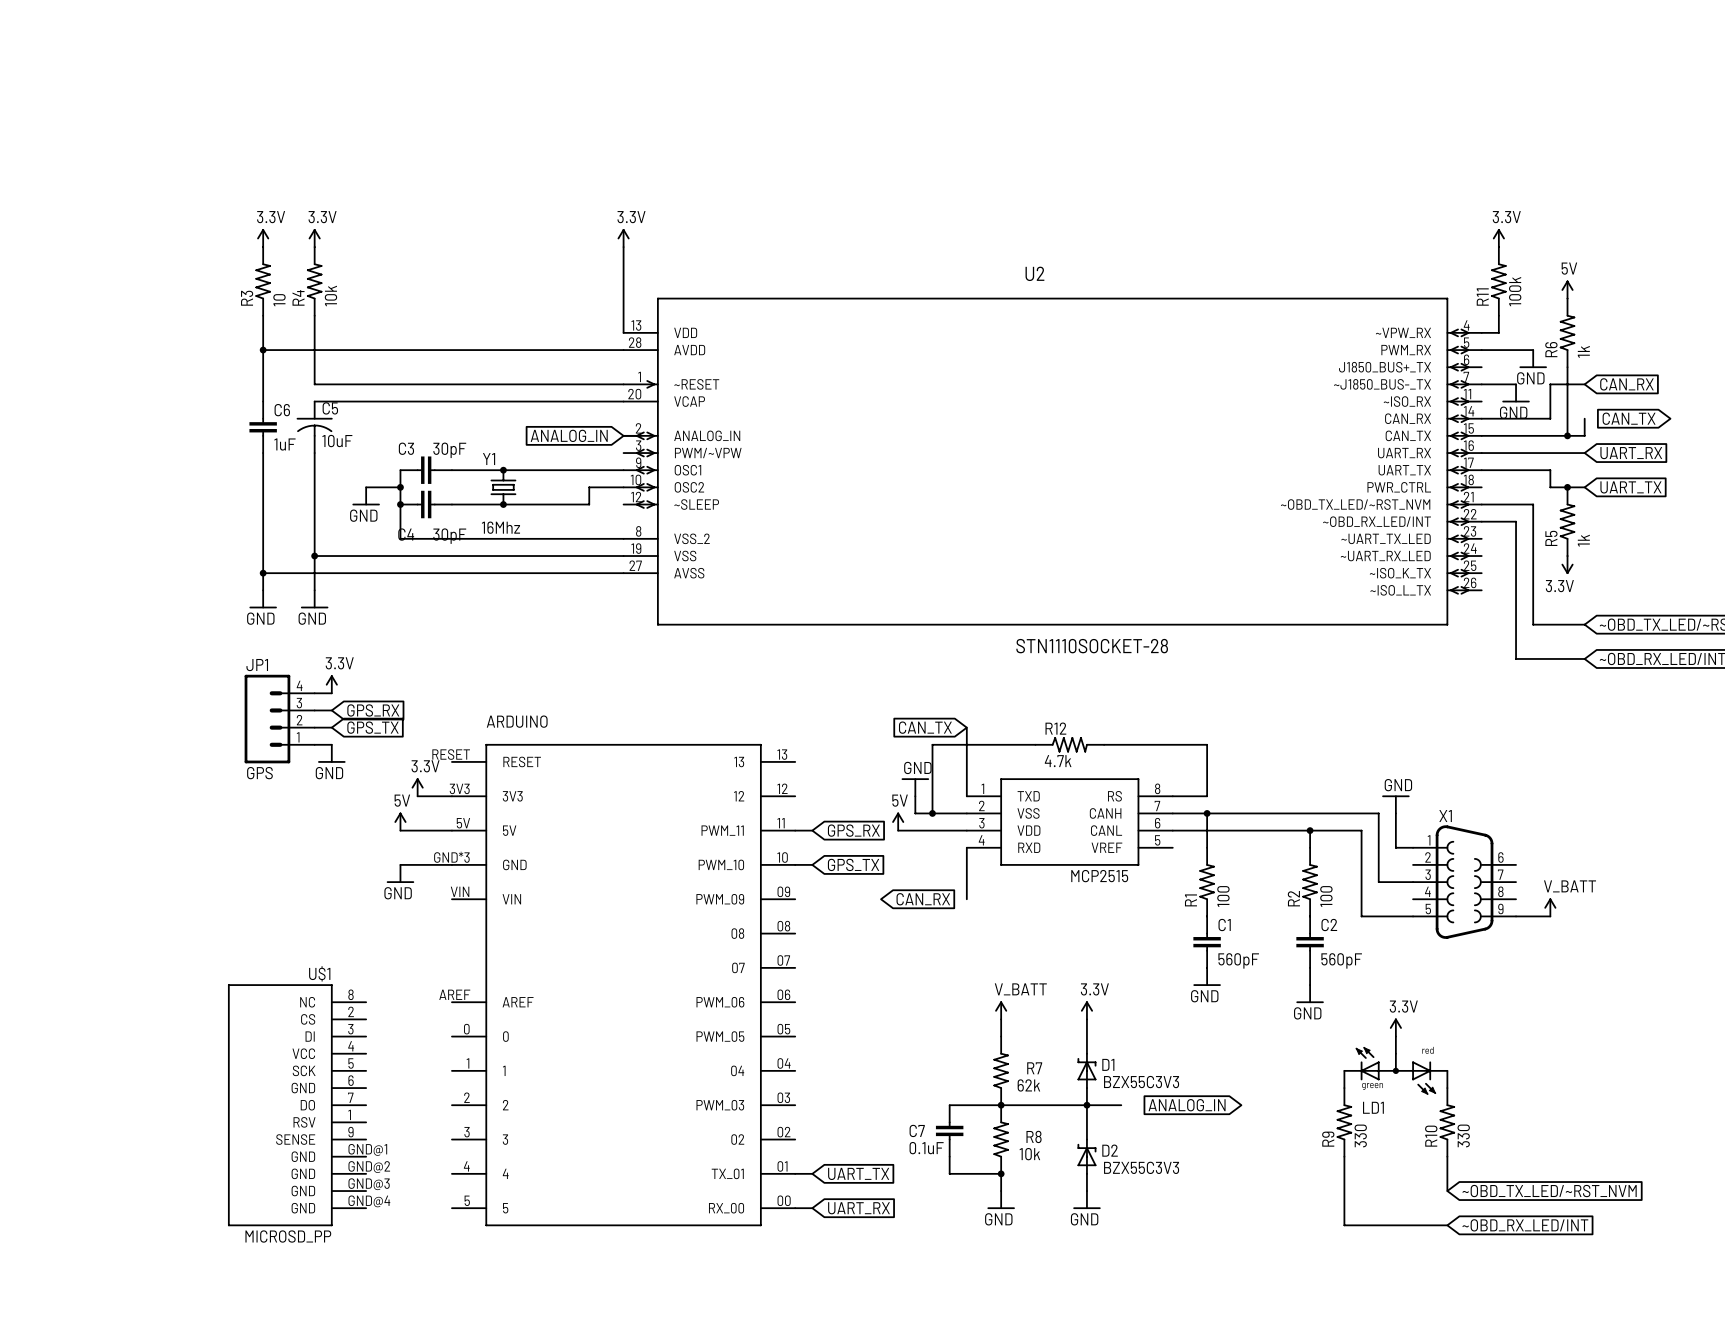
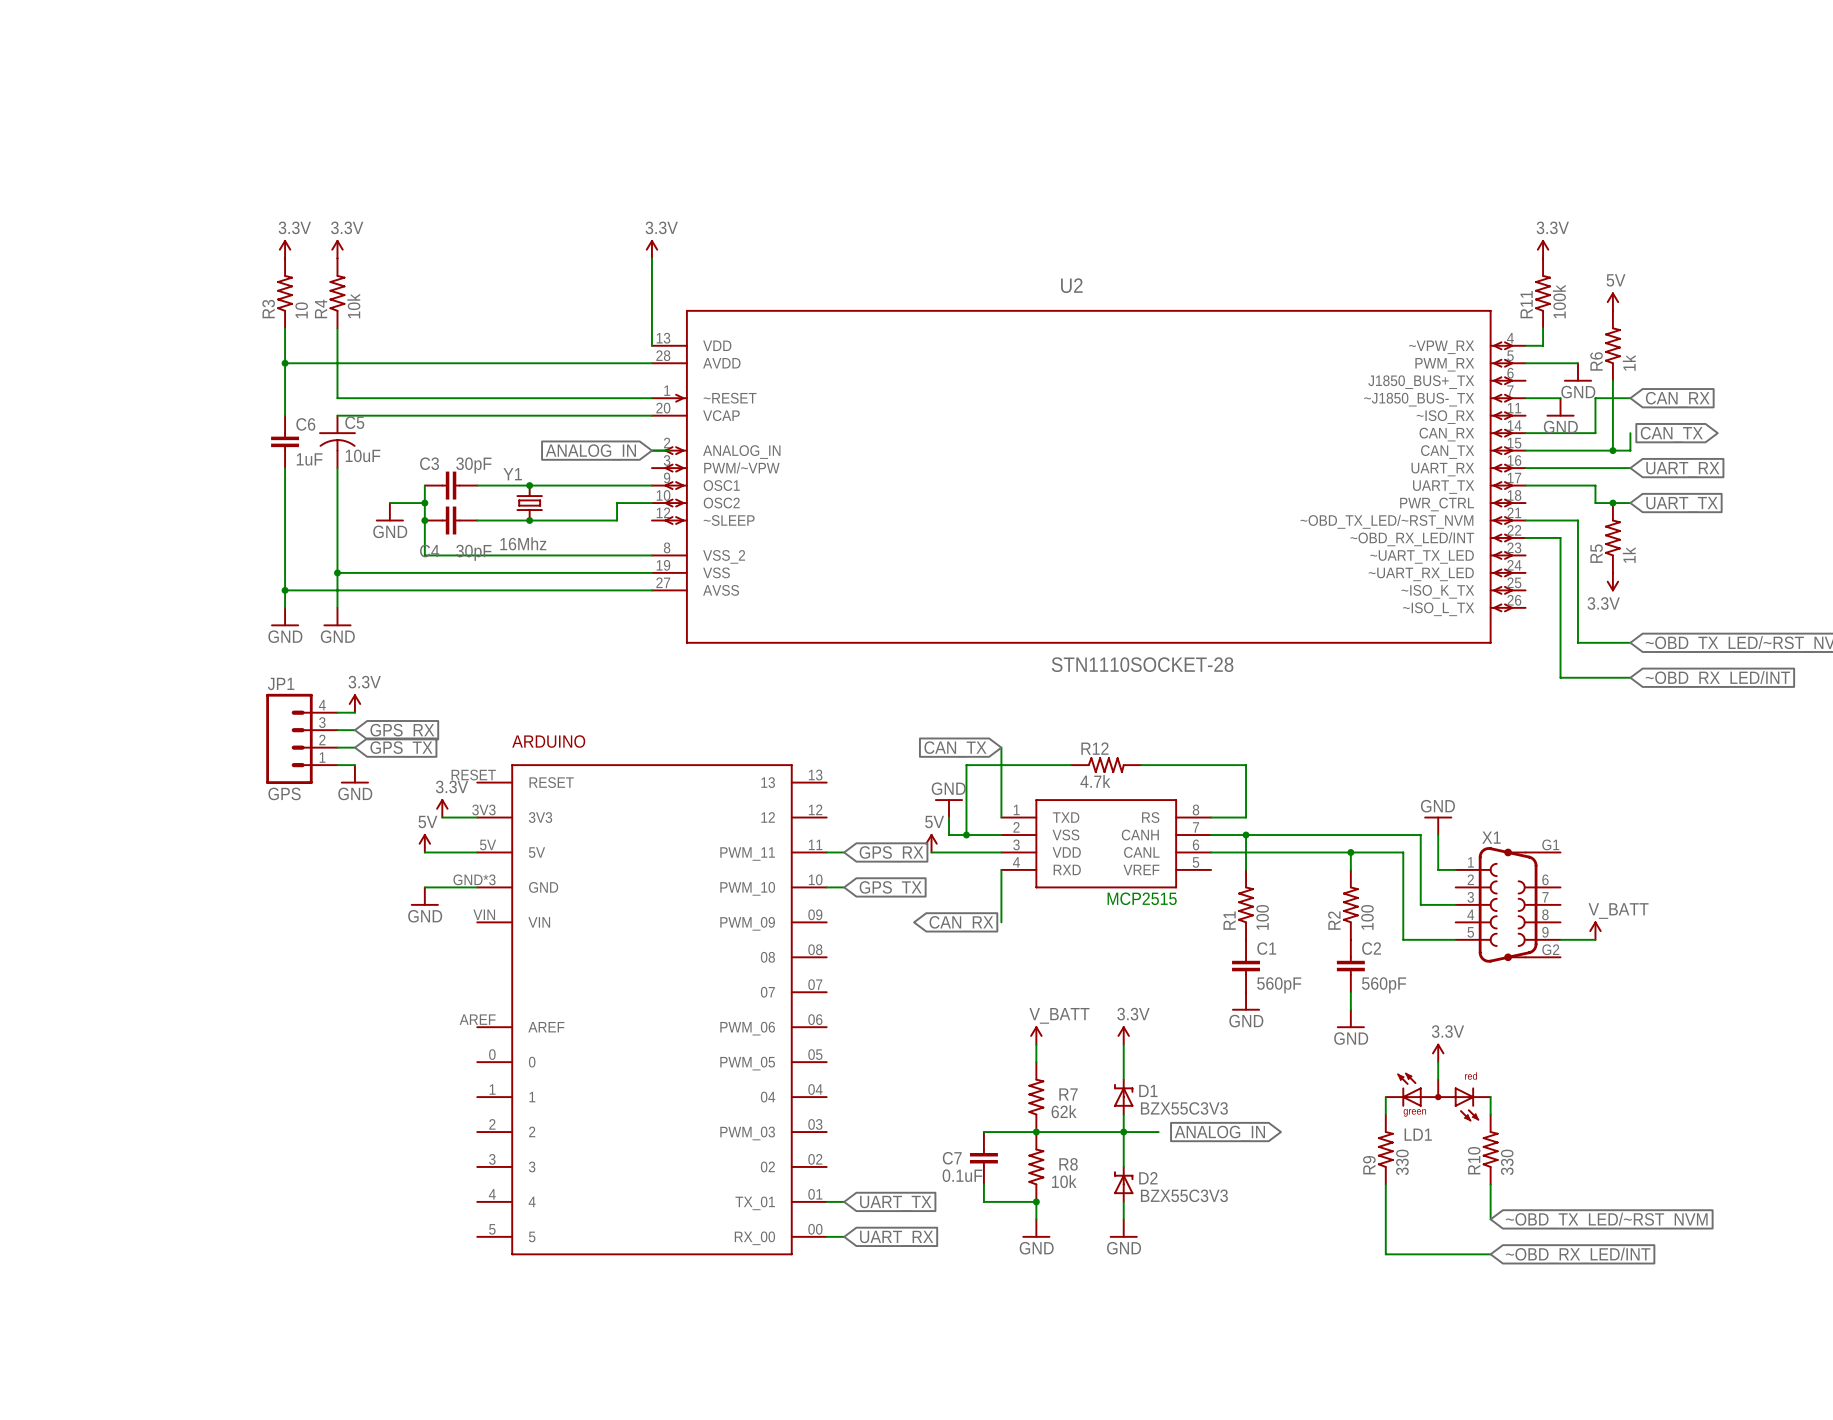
X1 symbol: [1413, 825, 1517, 939] -> [1455, 847, 1561, 963]
U$1: MICROSD_PP (297, 1105) -> none

